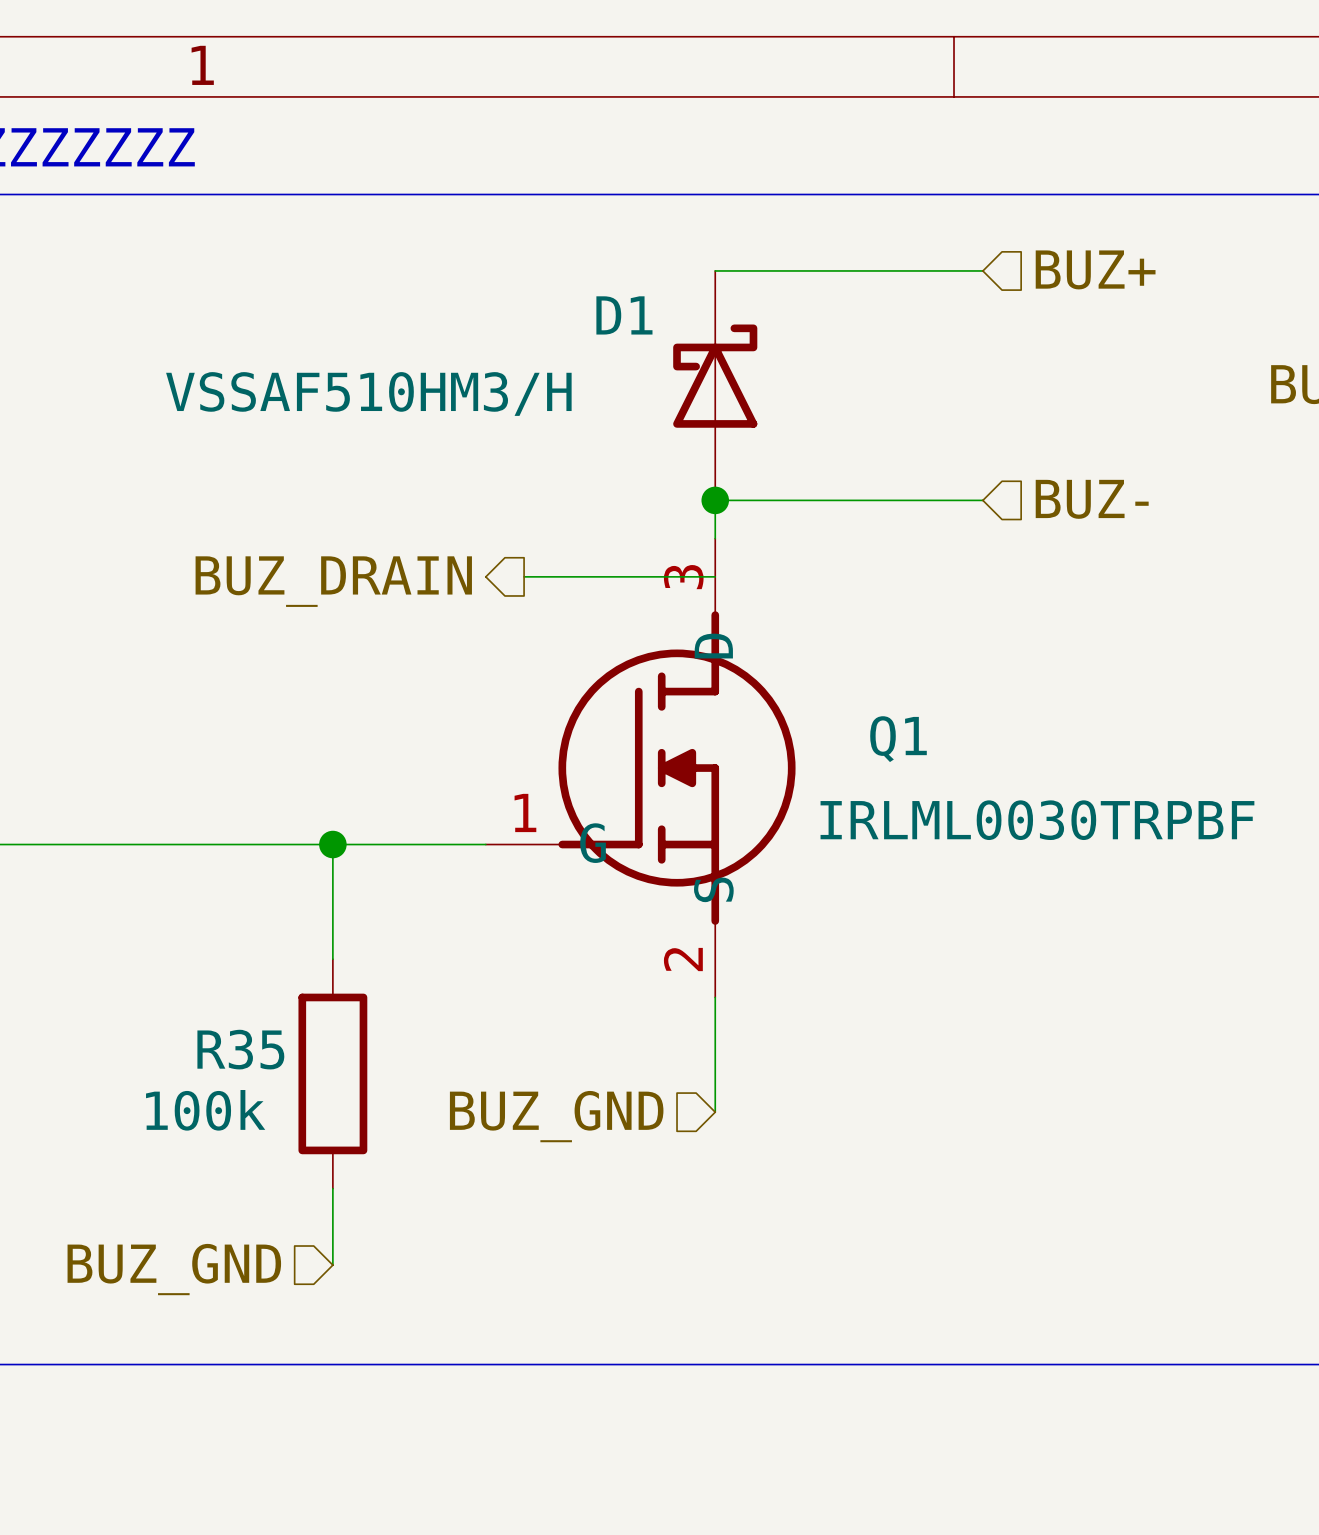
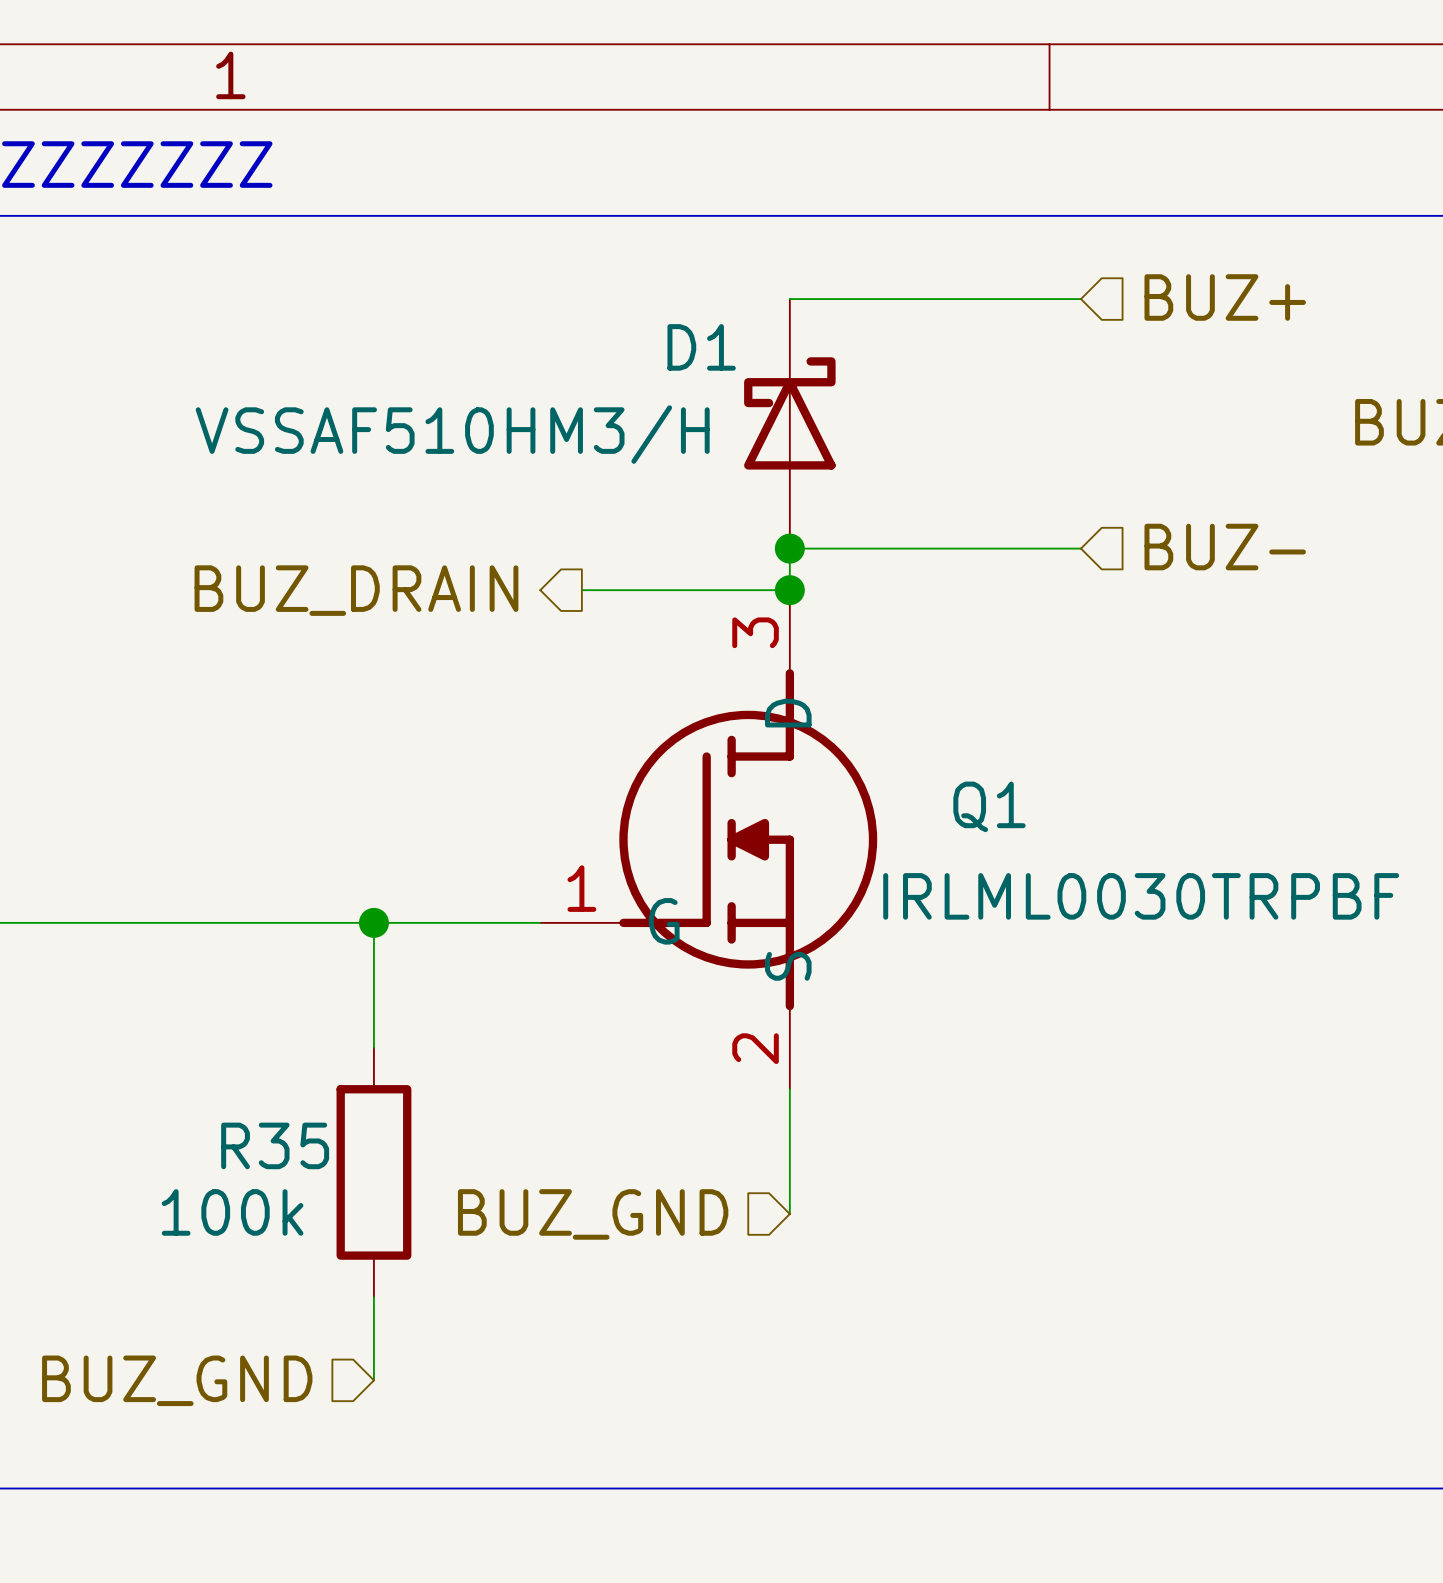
junction: none -> (789, 590)
wire: (524, 576) (715, 576) -> (581, 590) (789, 590)
hierarchical label position: BUZ_DRAIN (333, 581) -> BUZ_DRAIN (356, 590)

